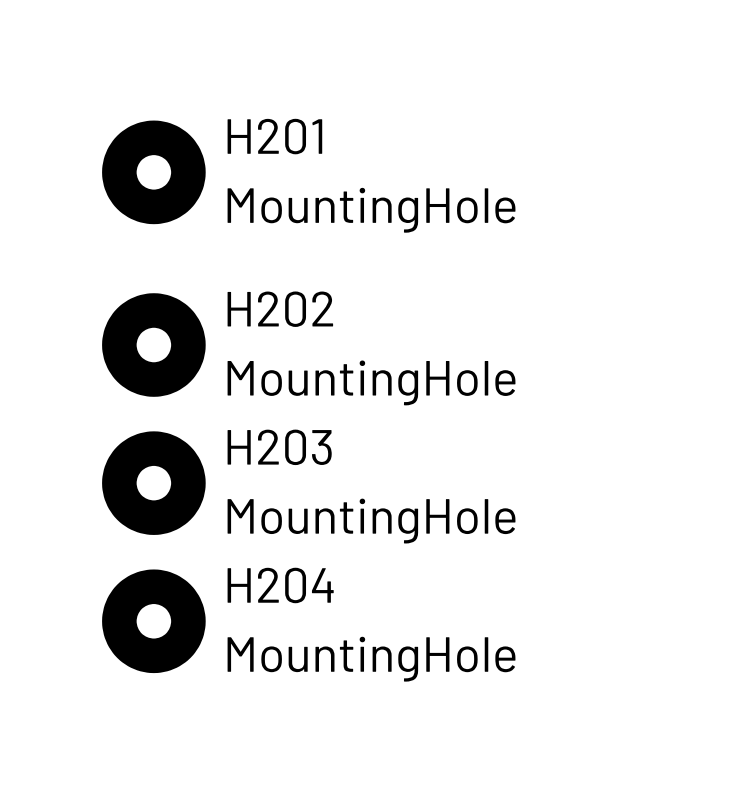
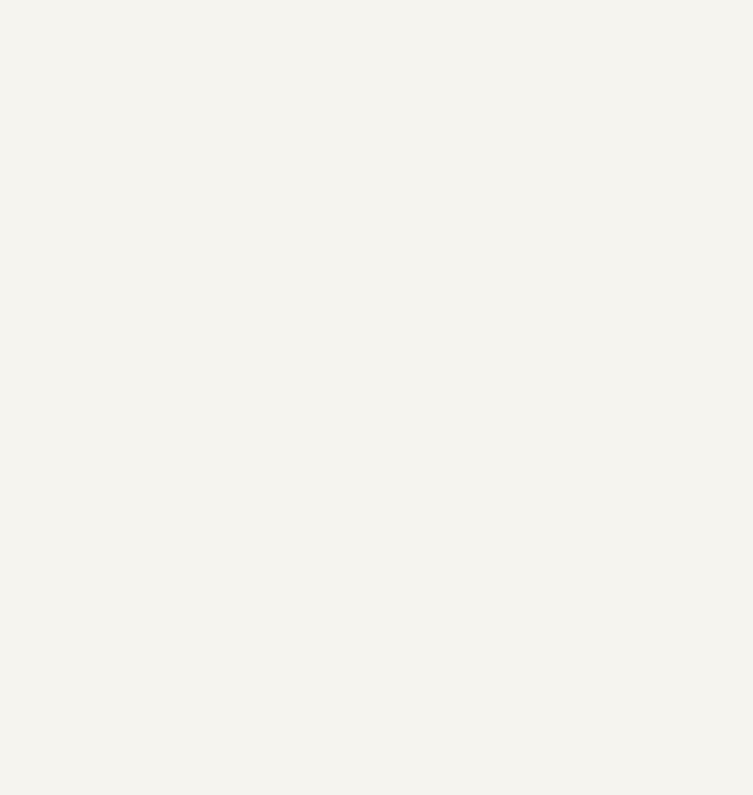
H201: MountingHole (153, 172) -> none
H202: MountingHole (153, 345) -> none
H203: MountingHole (153, 483) -> none
H204: MountingHole (153, 621) -> none

